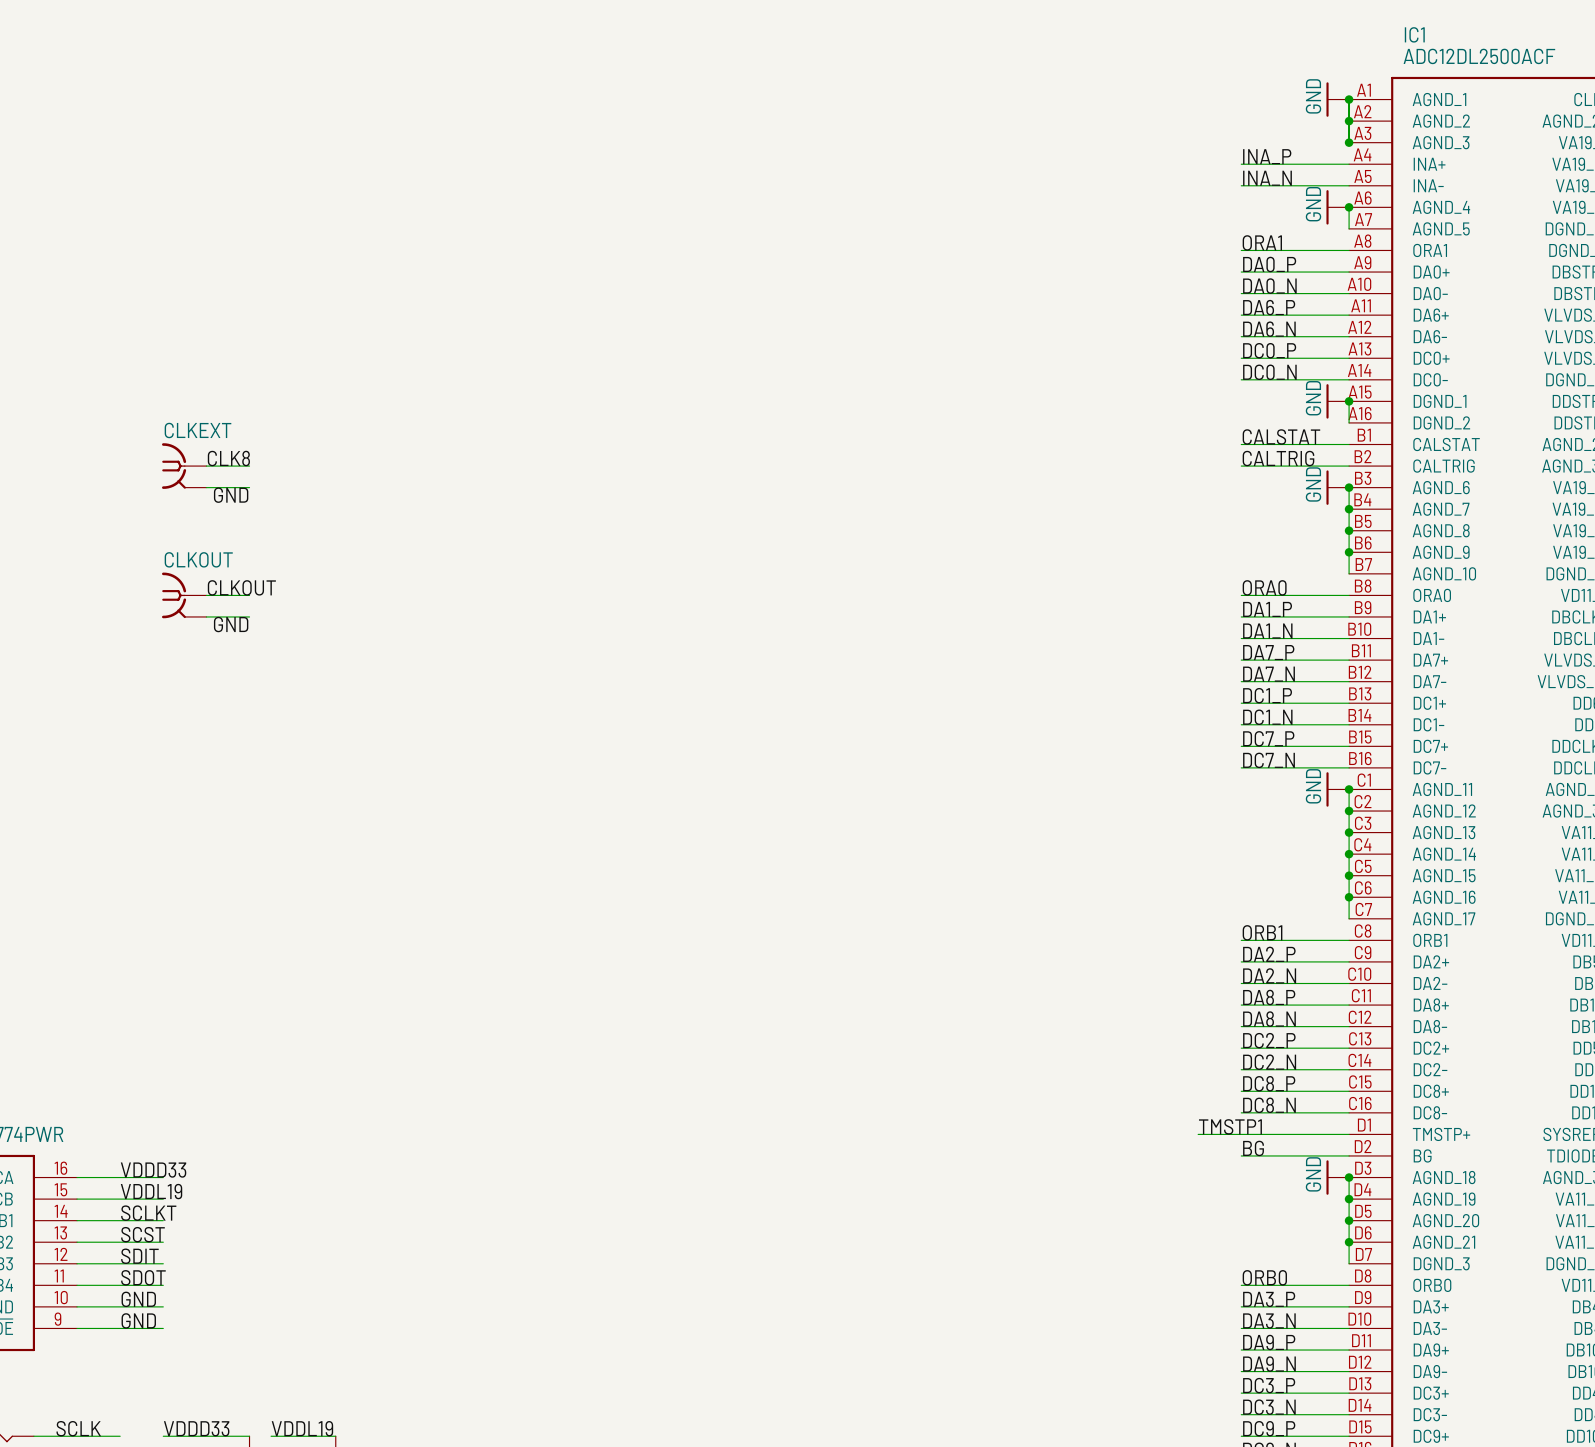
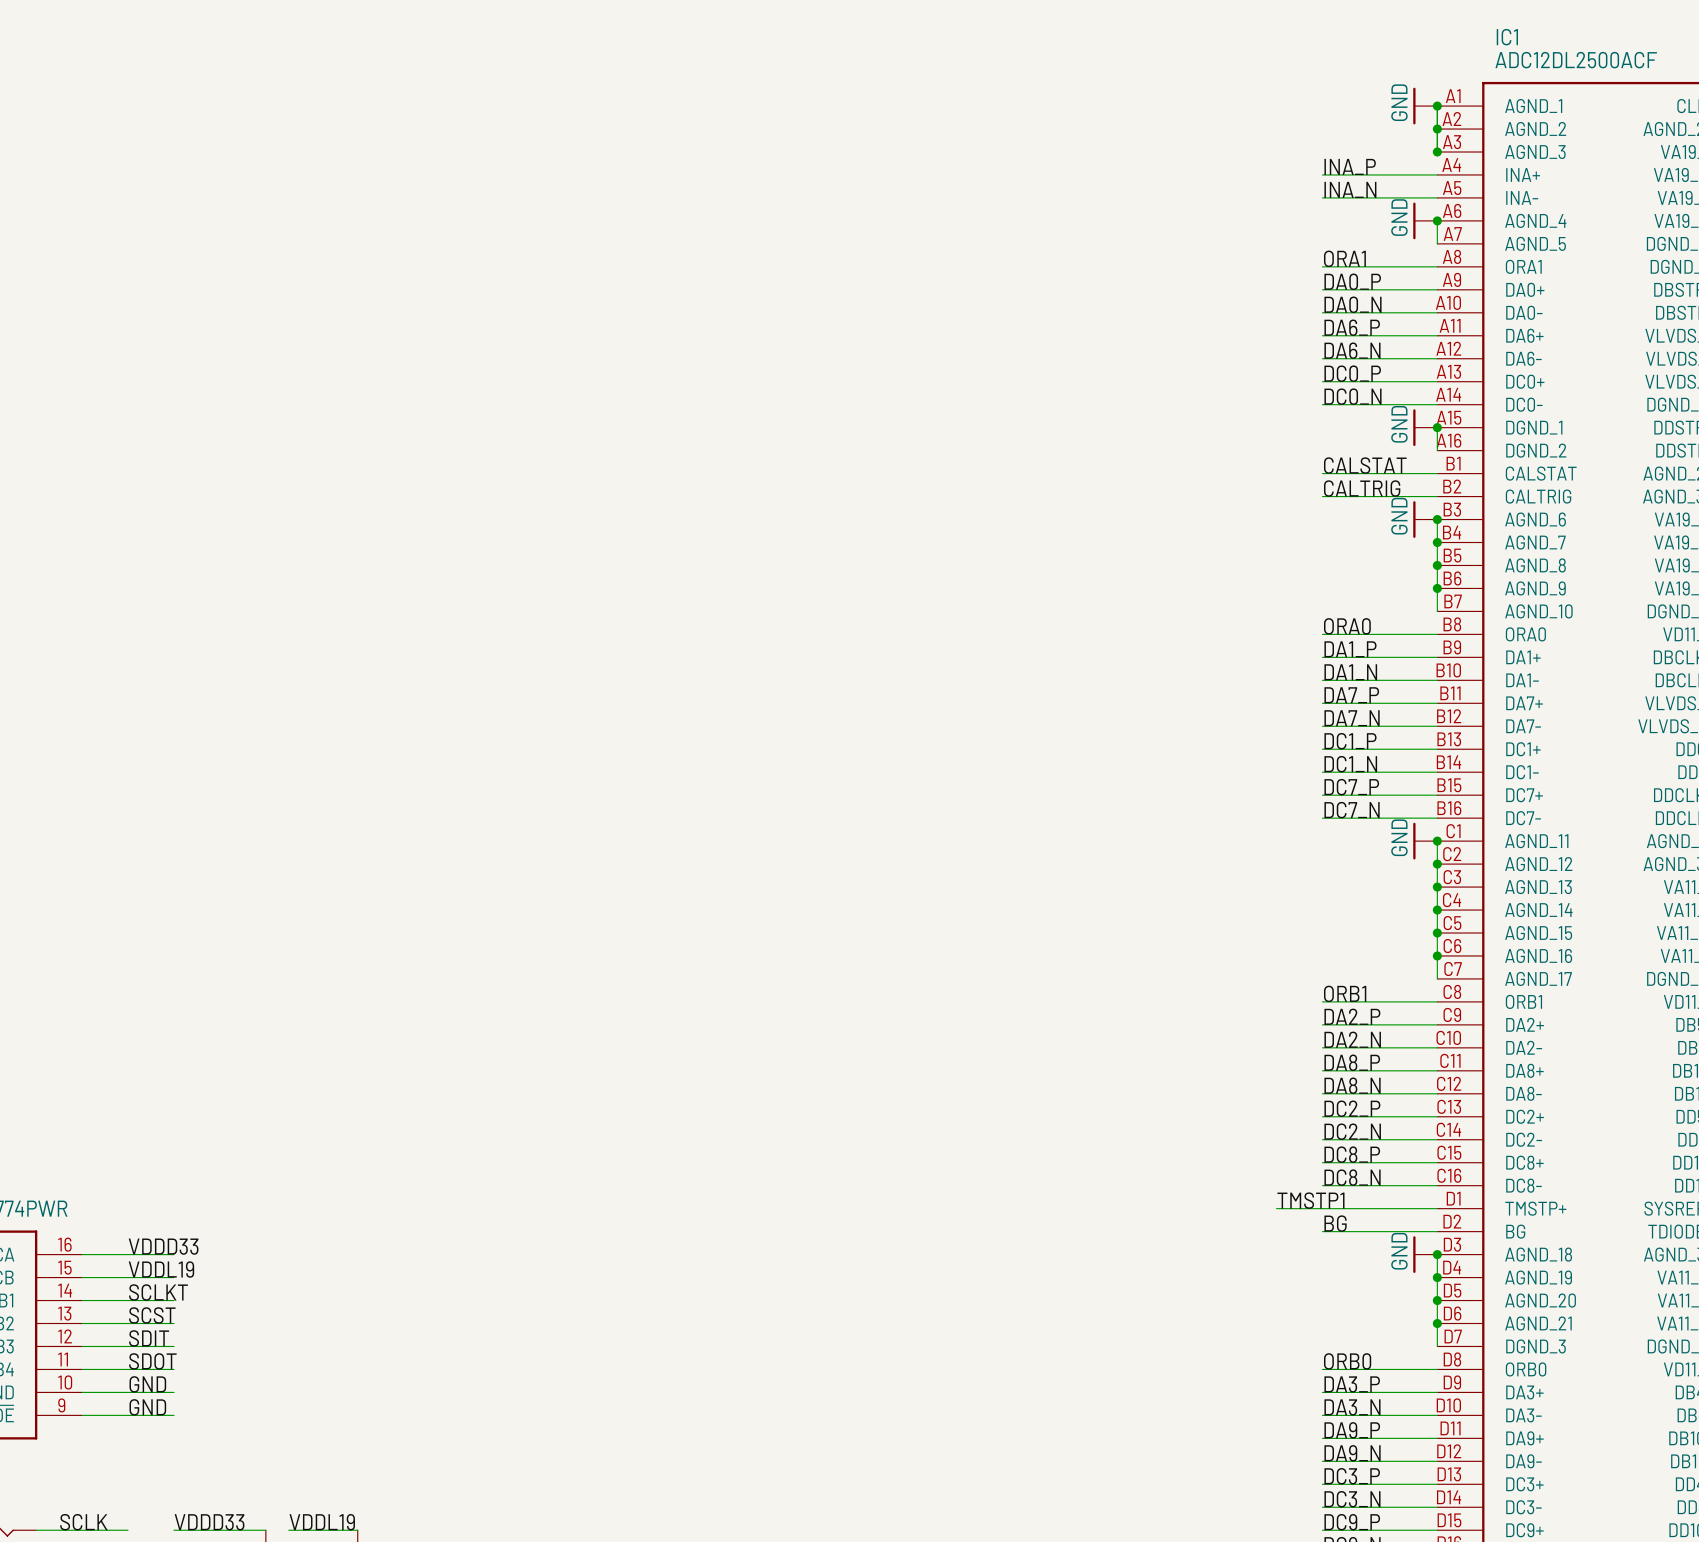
label: CLK8 (228, 458) -> none
CLKEXT: (184, 466) -> none
wire: (206, 466) (249, 466) -> none
wire: (206, 487) (249, 487) -> none
label: GND (231, 495) -> none
label: CLKOUT (241, 587) -> none
CLKOUT: (184, 595) -> none
wire: (206, 595) (249, 595) -> none
wire: (206, 616) (249, 616) -> none
label: GND (231, 624) -> none

